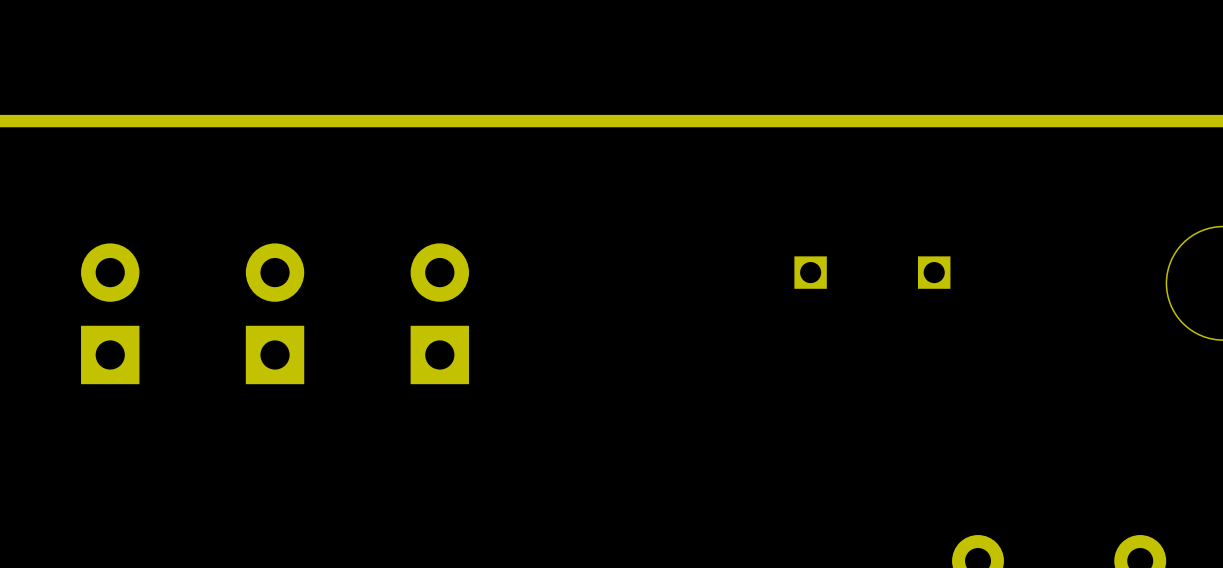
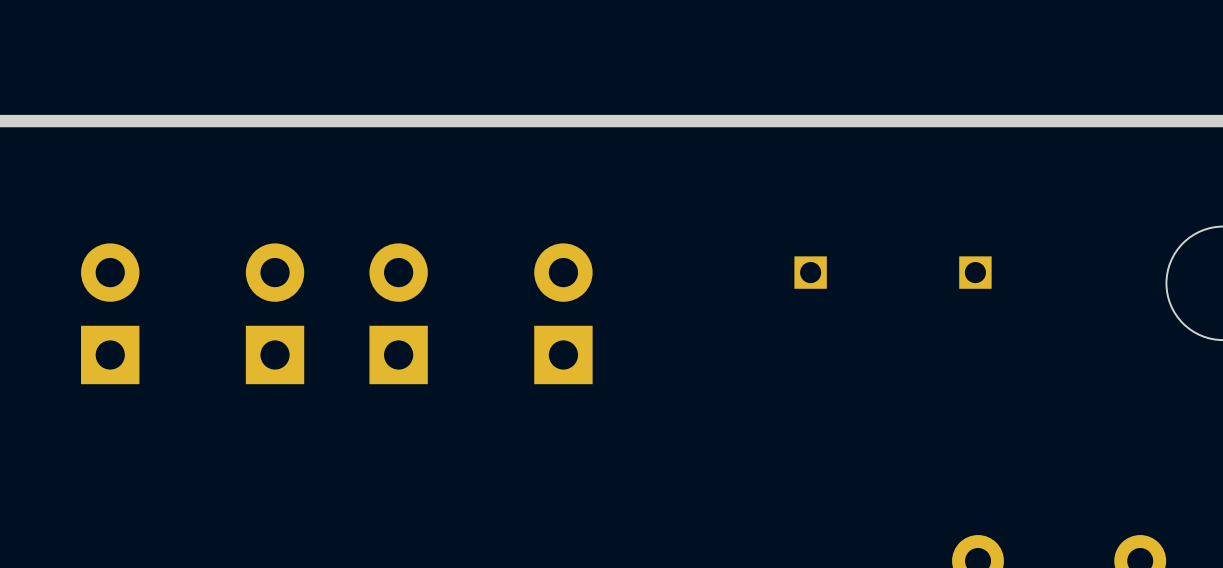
part position: (934, 272) -> (975, 272)
part position: (439, 313) -> (398, 313)
part: none -> (563, 313)

